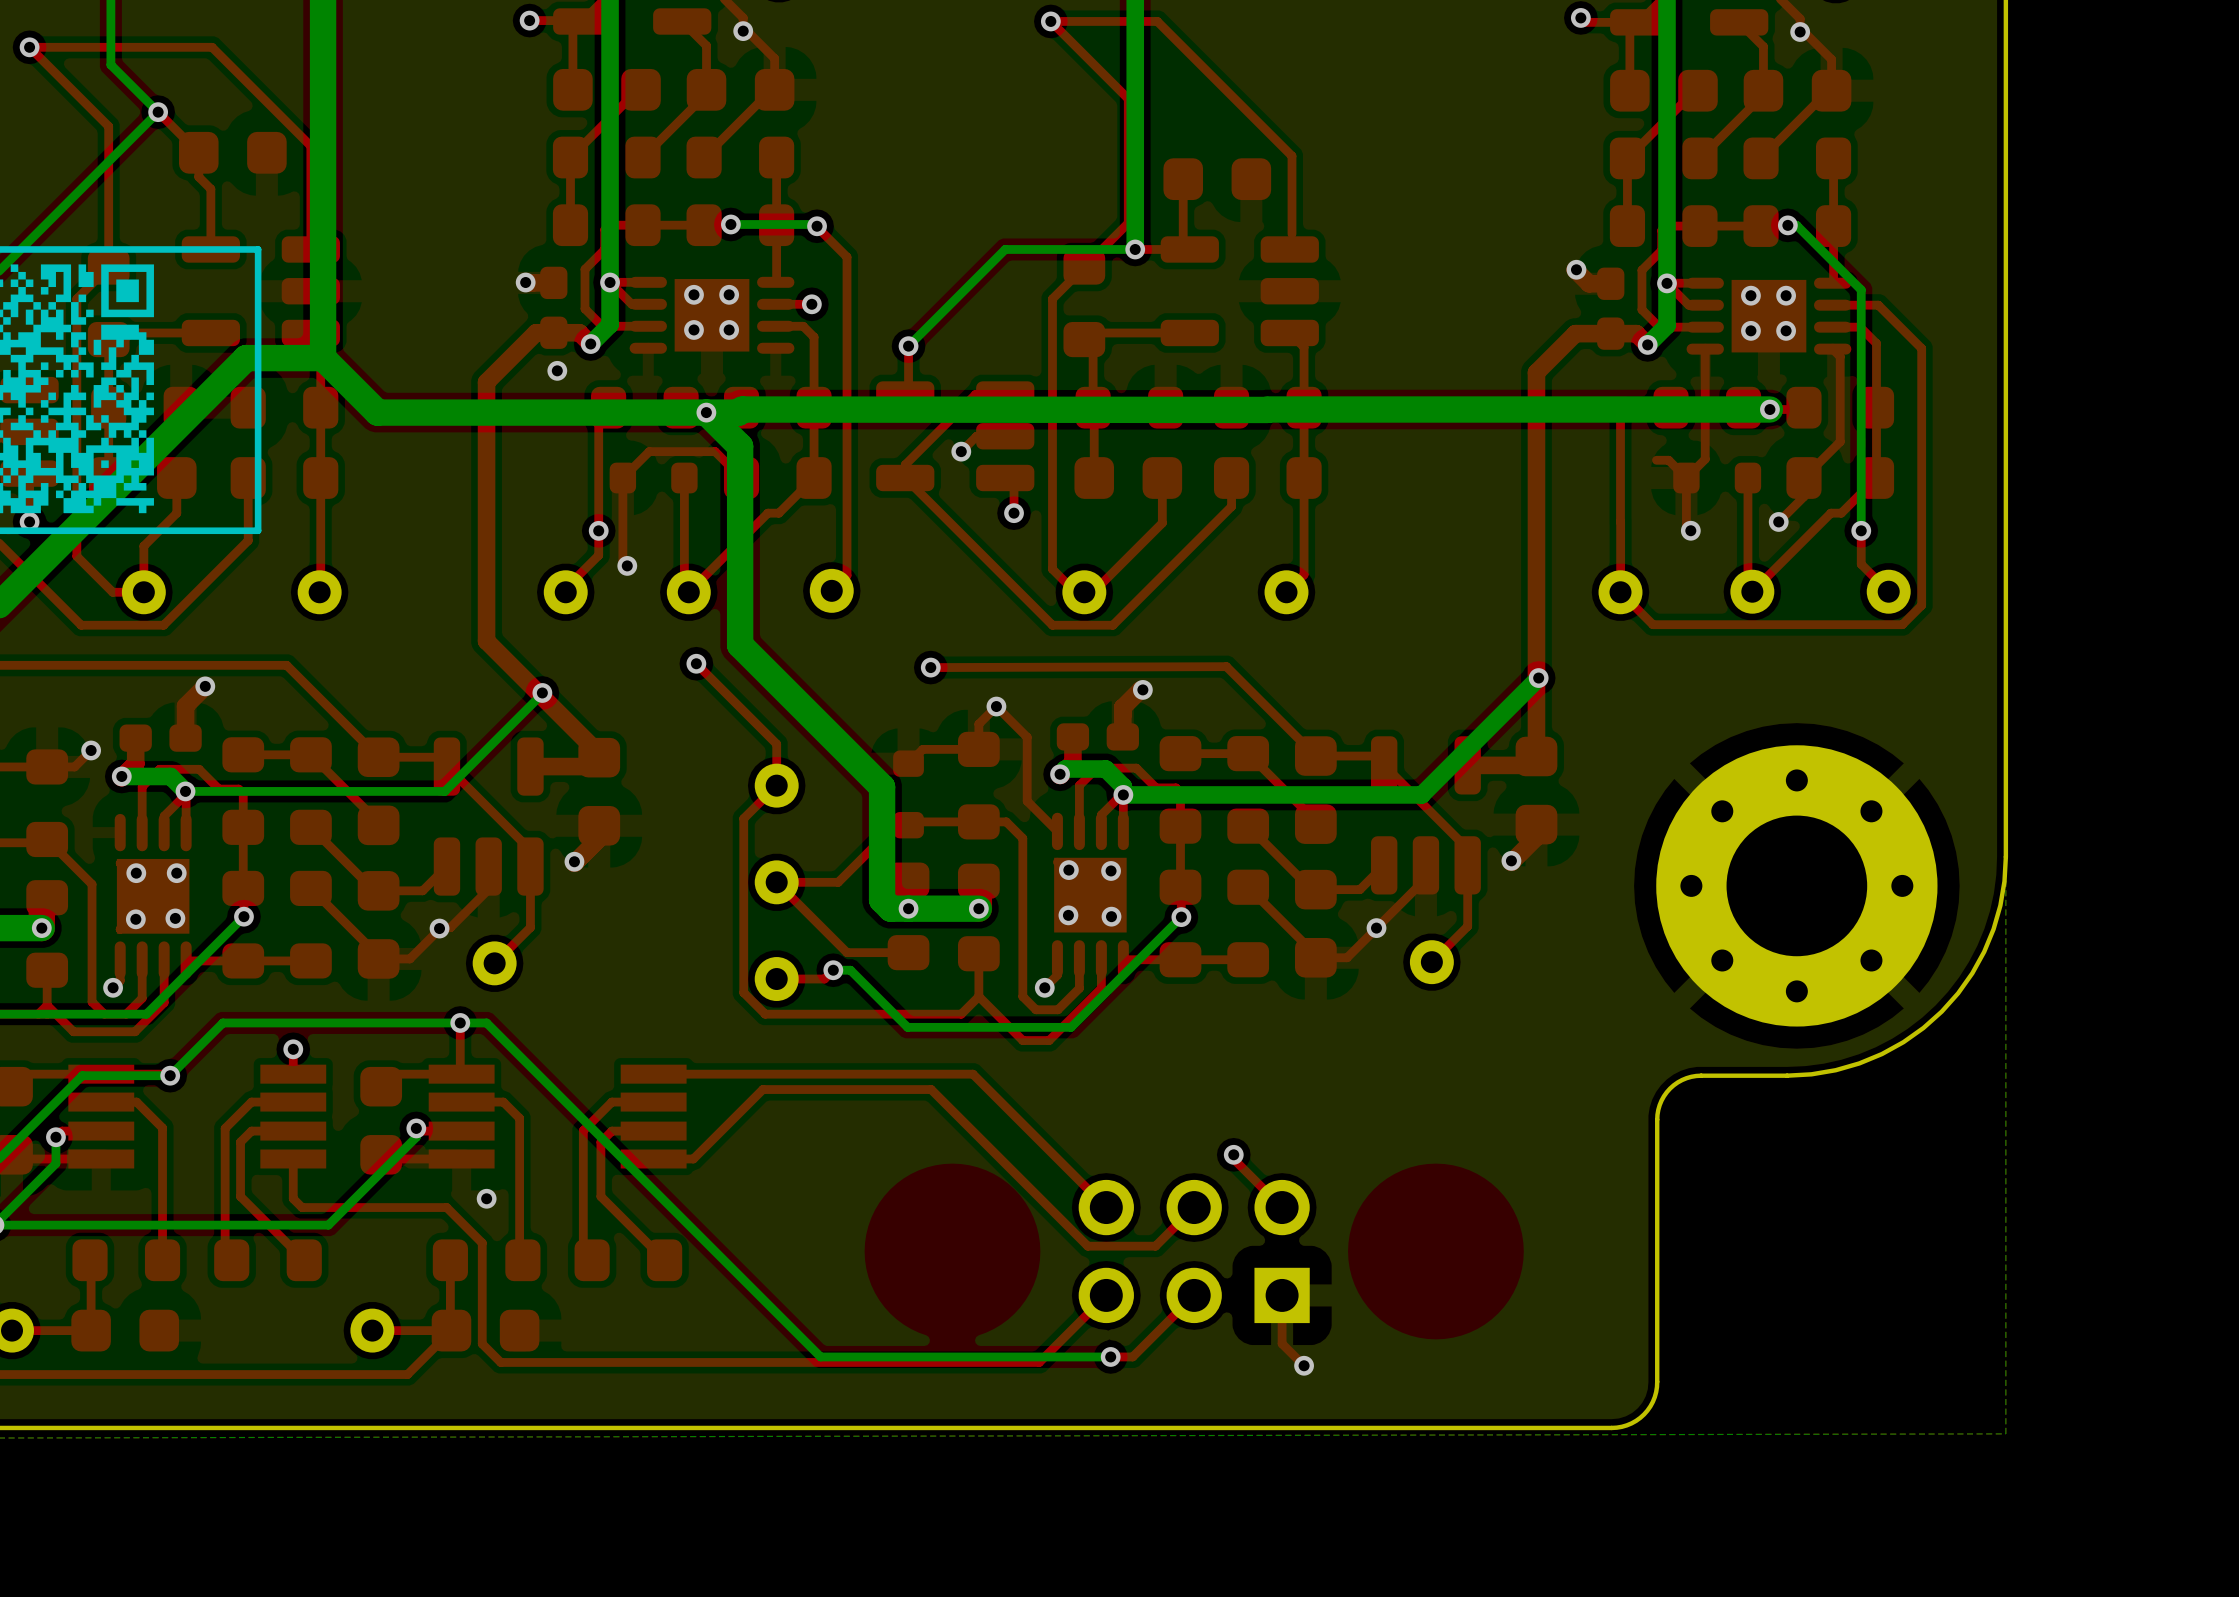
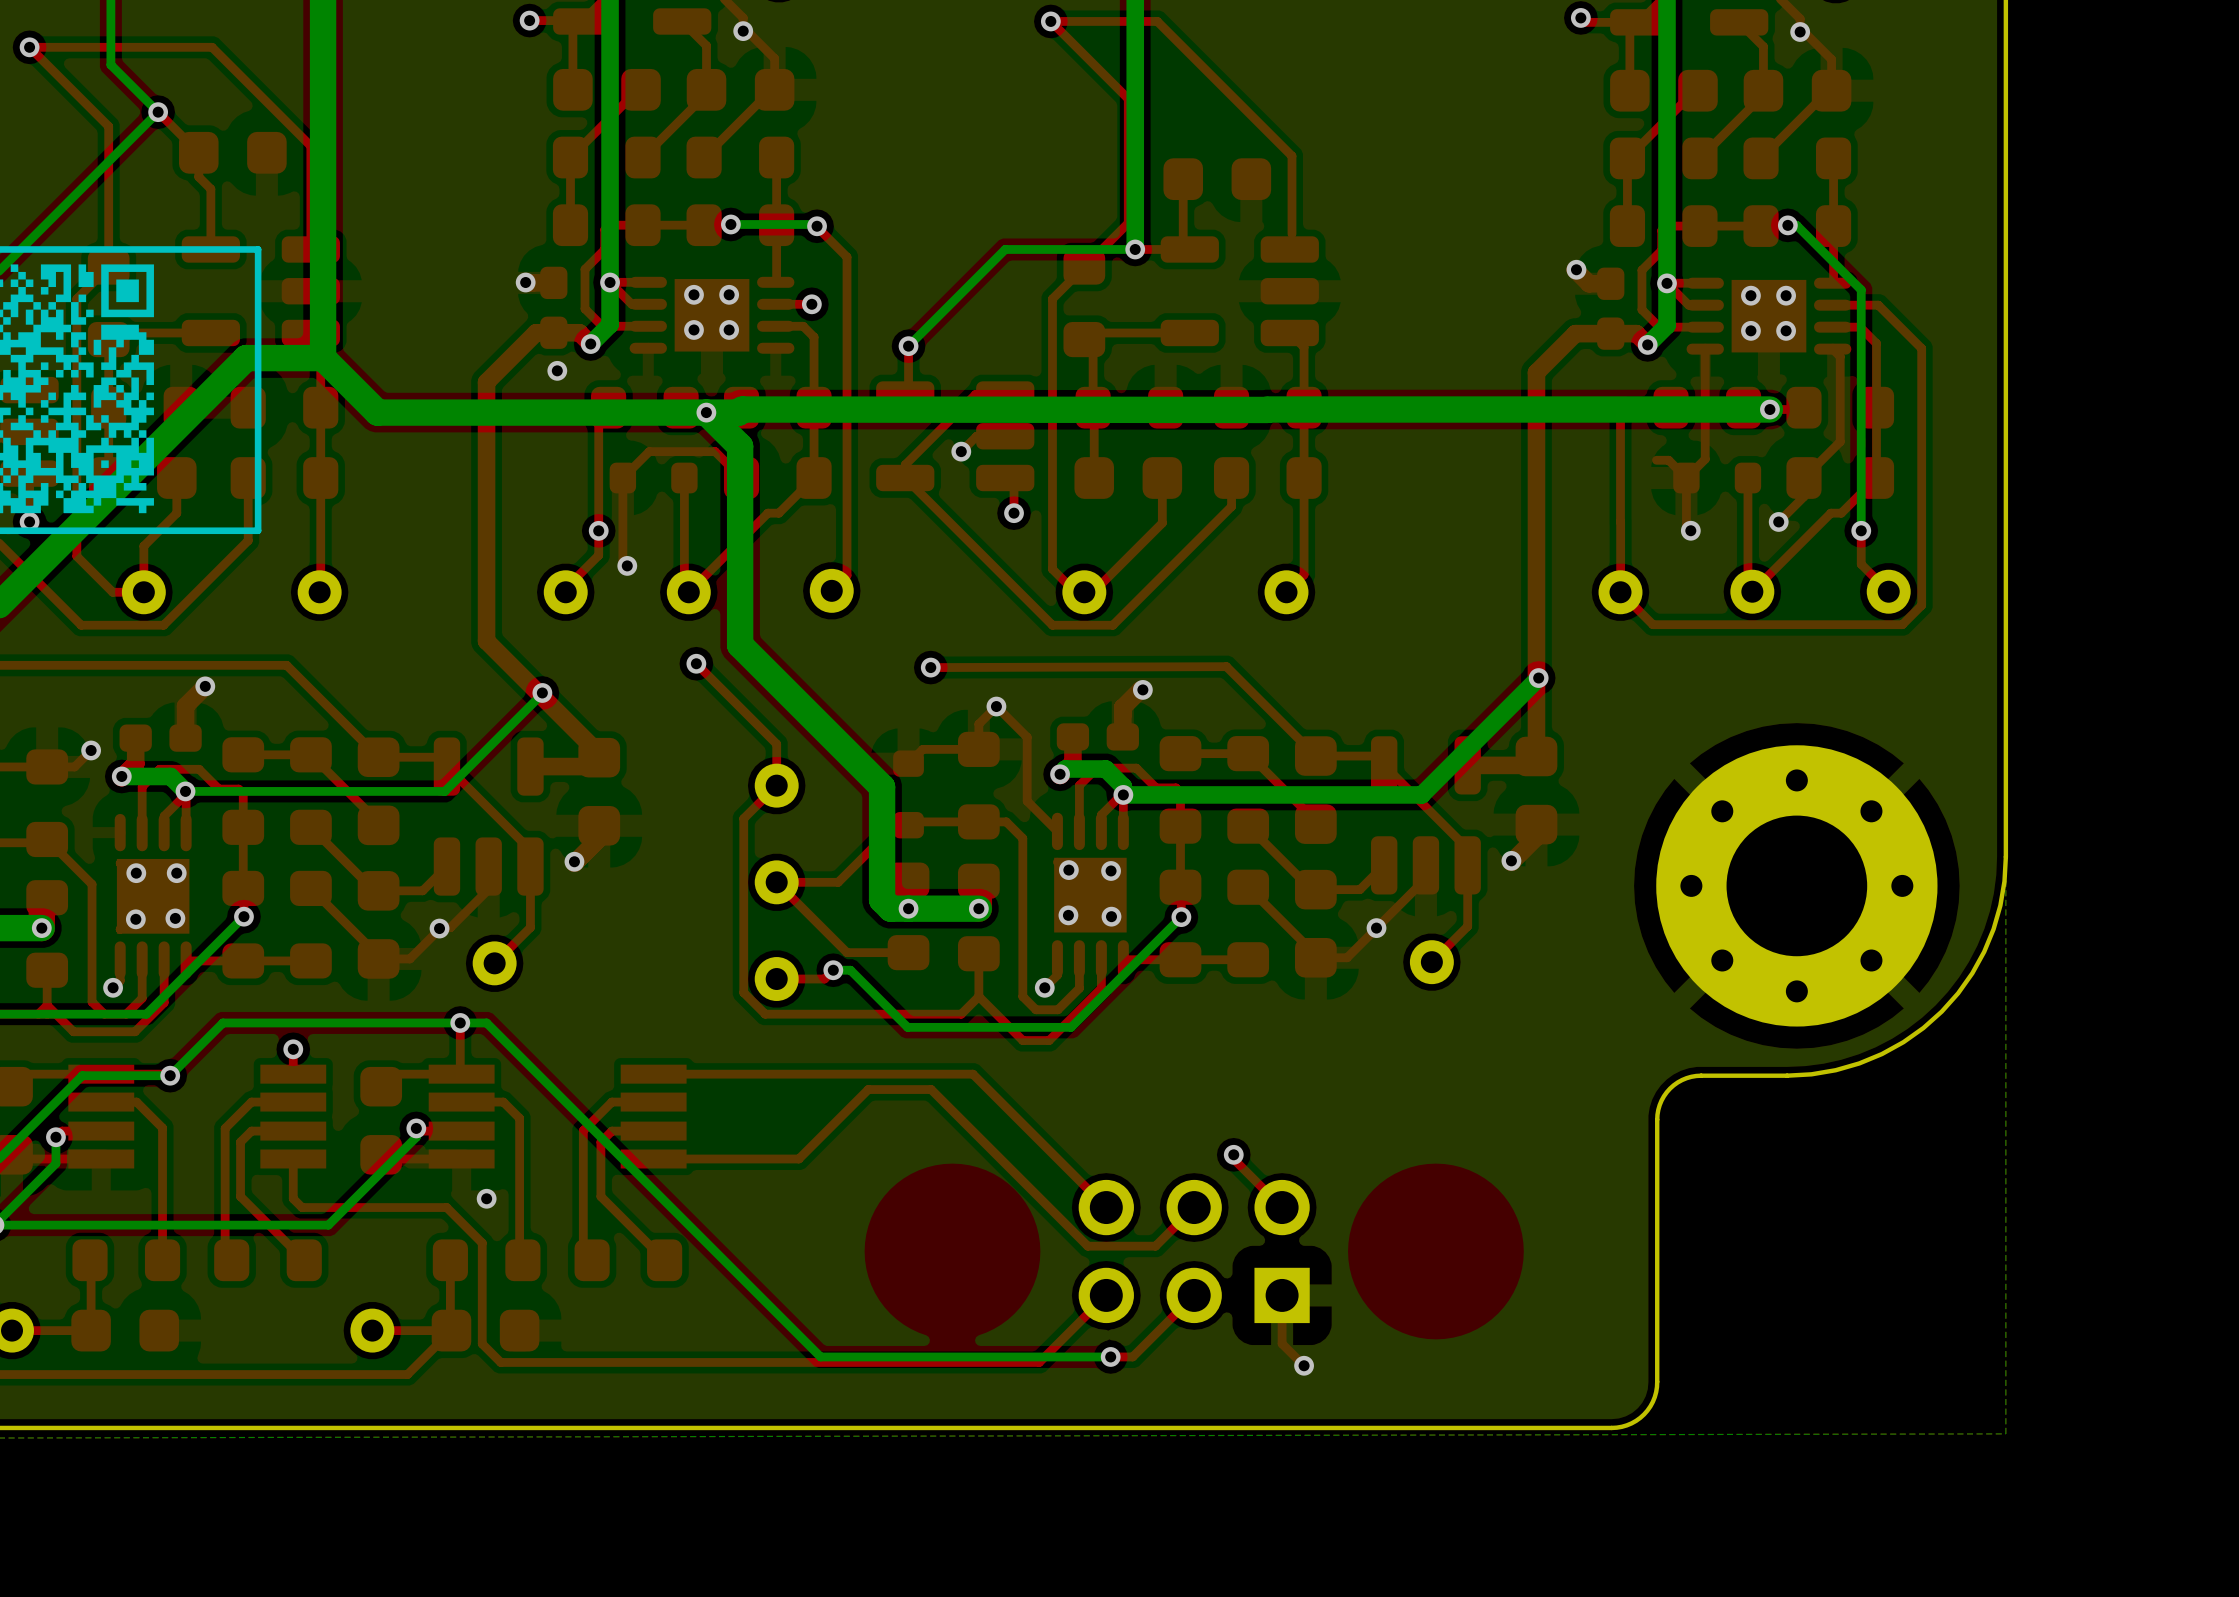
top track: (868, 1089) (762, 1089) (693, 1159) -> (868, 1089) (798, 1159) (693, 1159)

